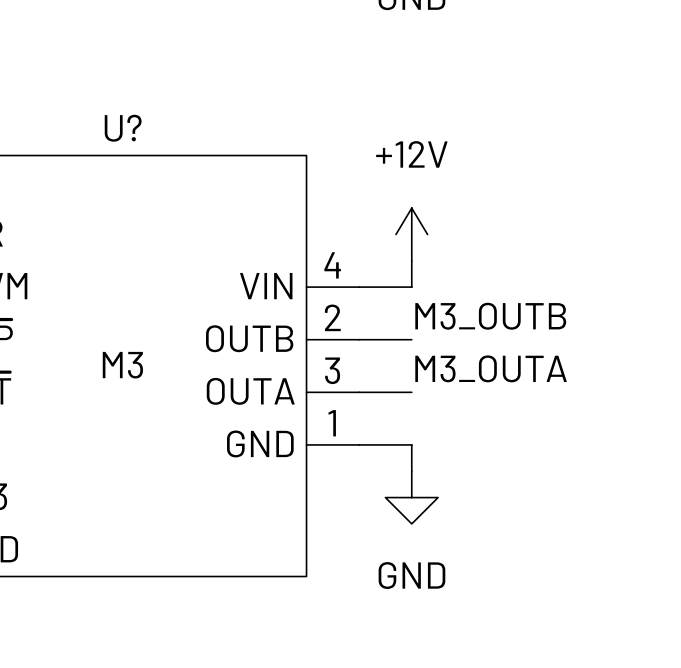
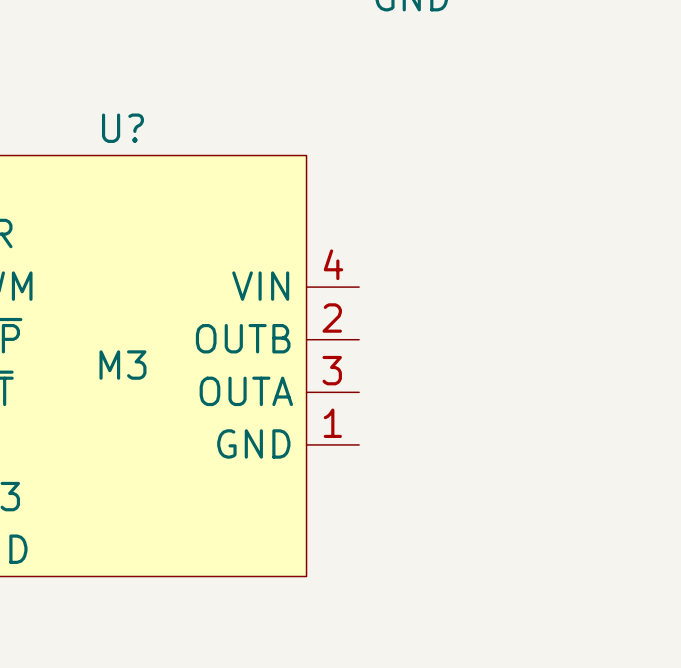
power symbol: +12V (411, 234) -> none
wire: (411, 260) (411, 287) (359, 287) -> none
label: M3_OUTB (490, 316) -> none
wire: (359, 339) (411, 339) -> none
label: M3_OUTA (491, 368) -> none
wire: (359, 392) (411, 392) -> none
wire: (359, 444) (411, 444) (411, 471) -> none
power symbol: GND (411, 497) -> none

